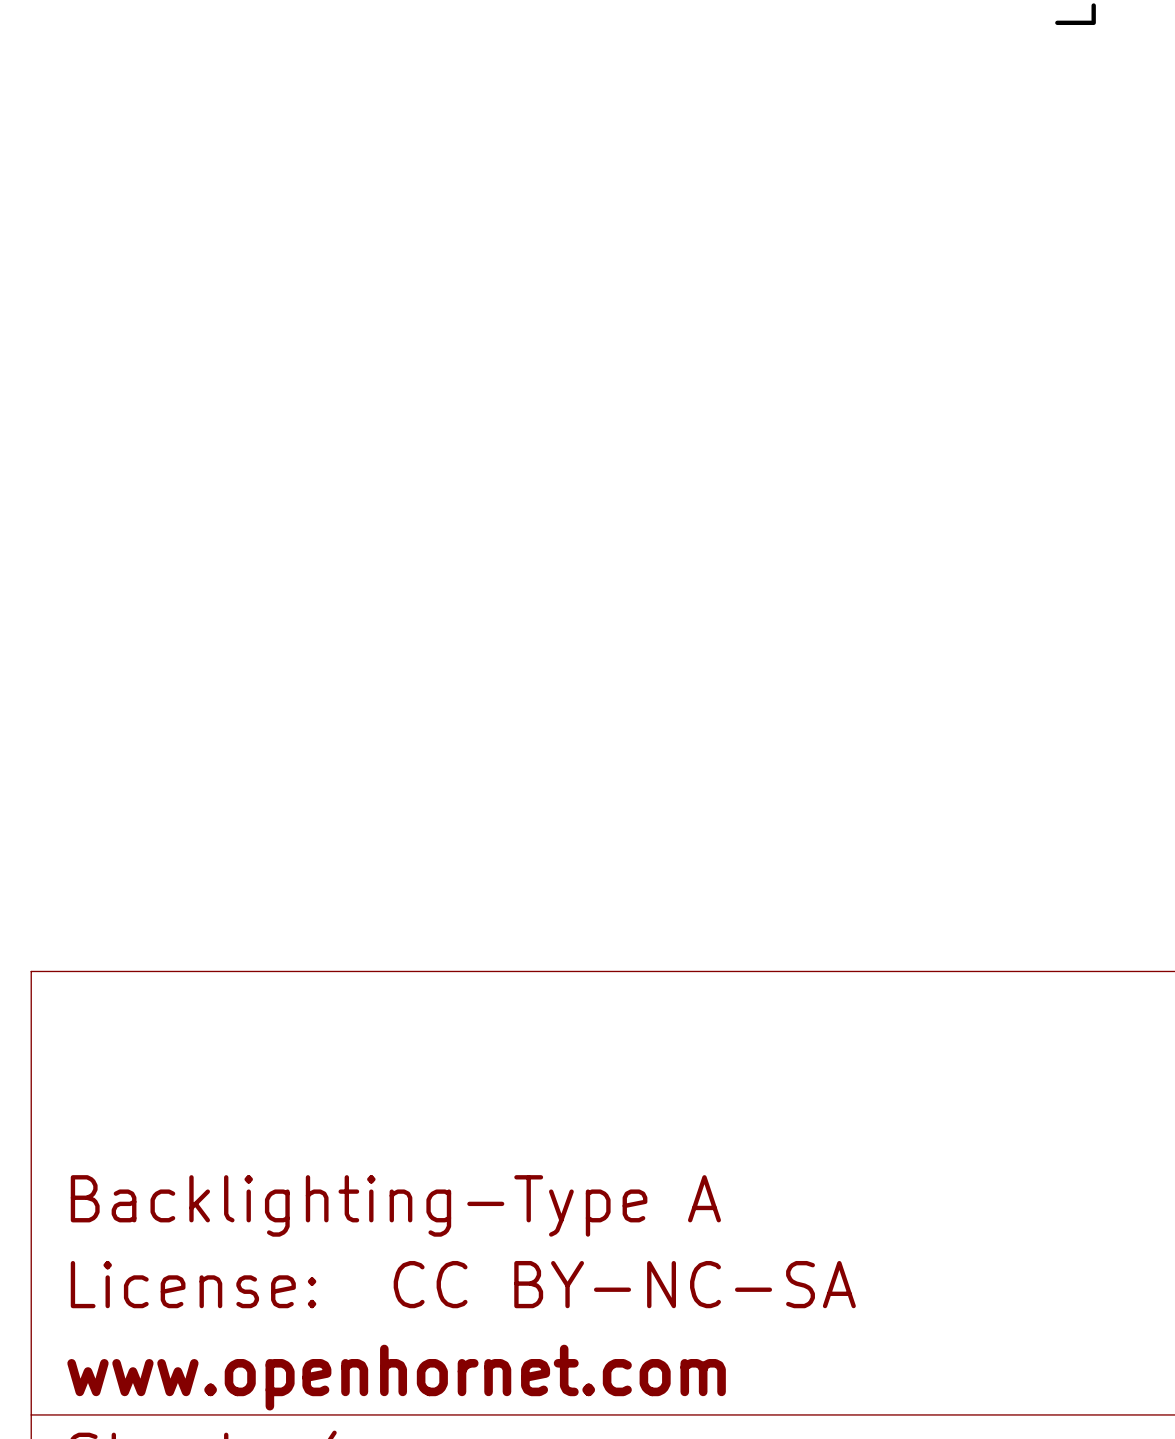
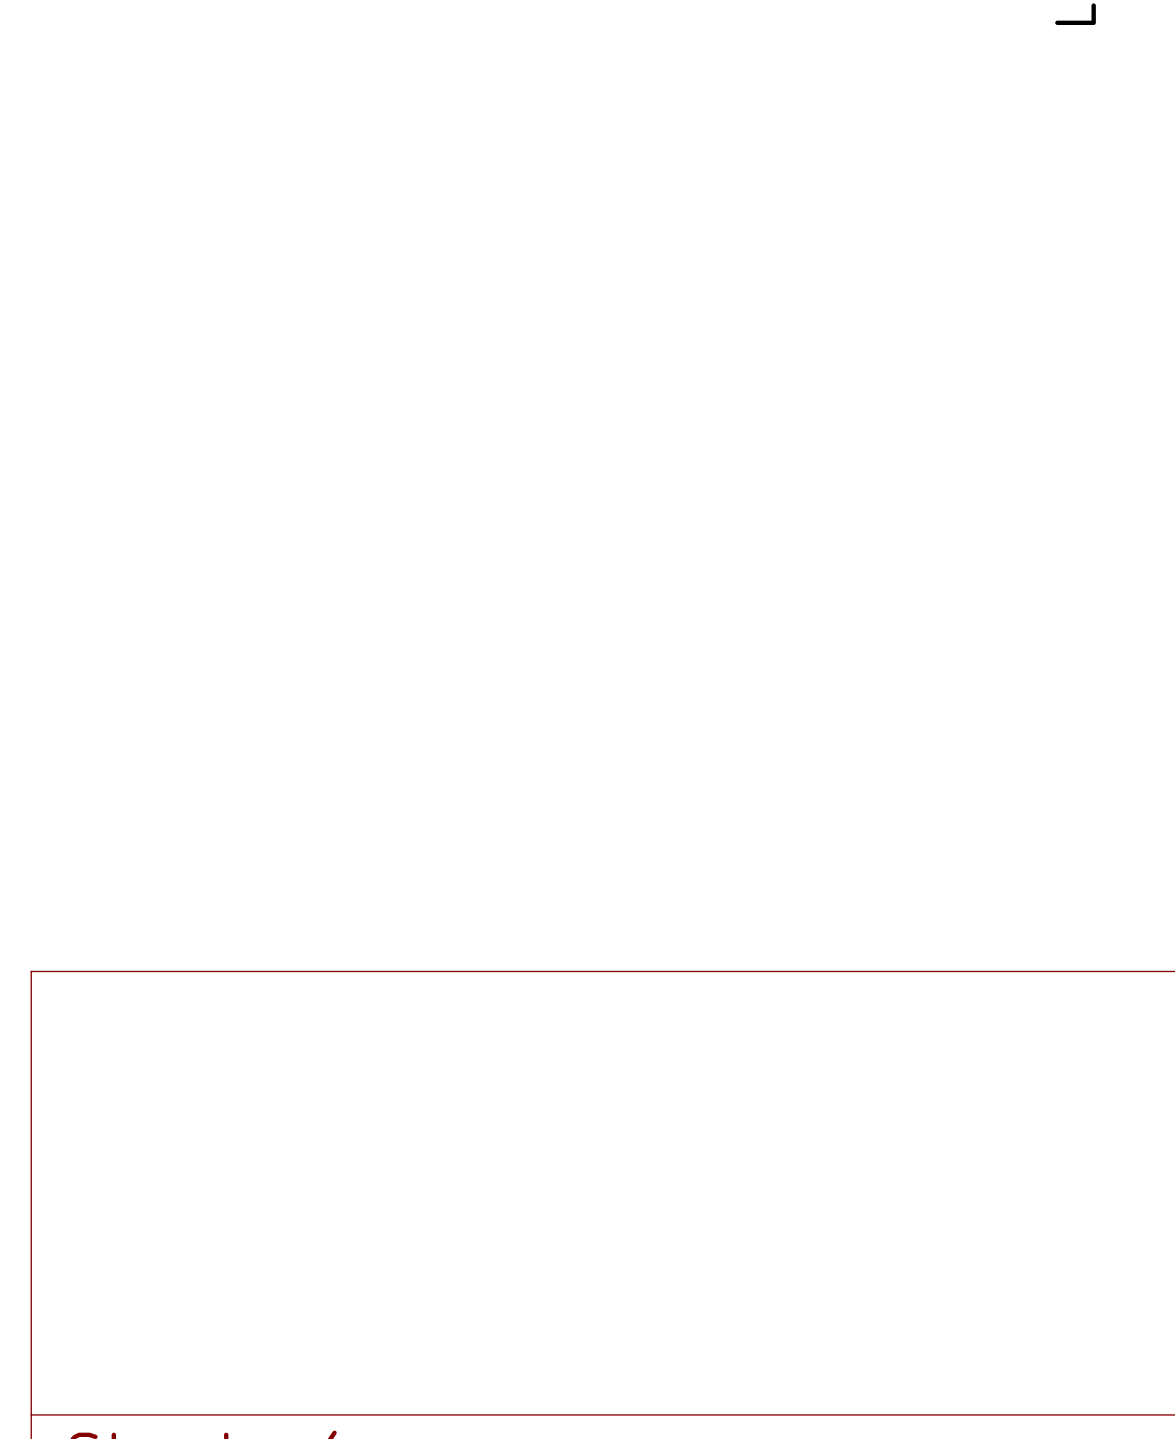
title block: Backlighting-Type A (395, 1205) -> none
title block: License: CC BY-NC-SA (463, 1284) -> none
title block: www.openhornet.com (396, 1377) -> none

